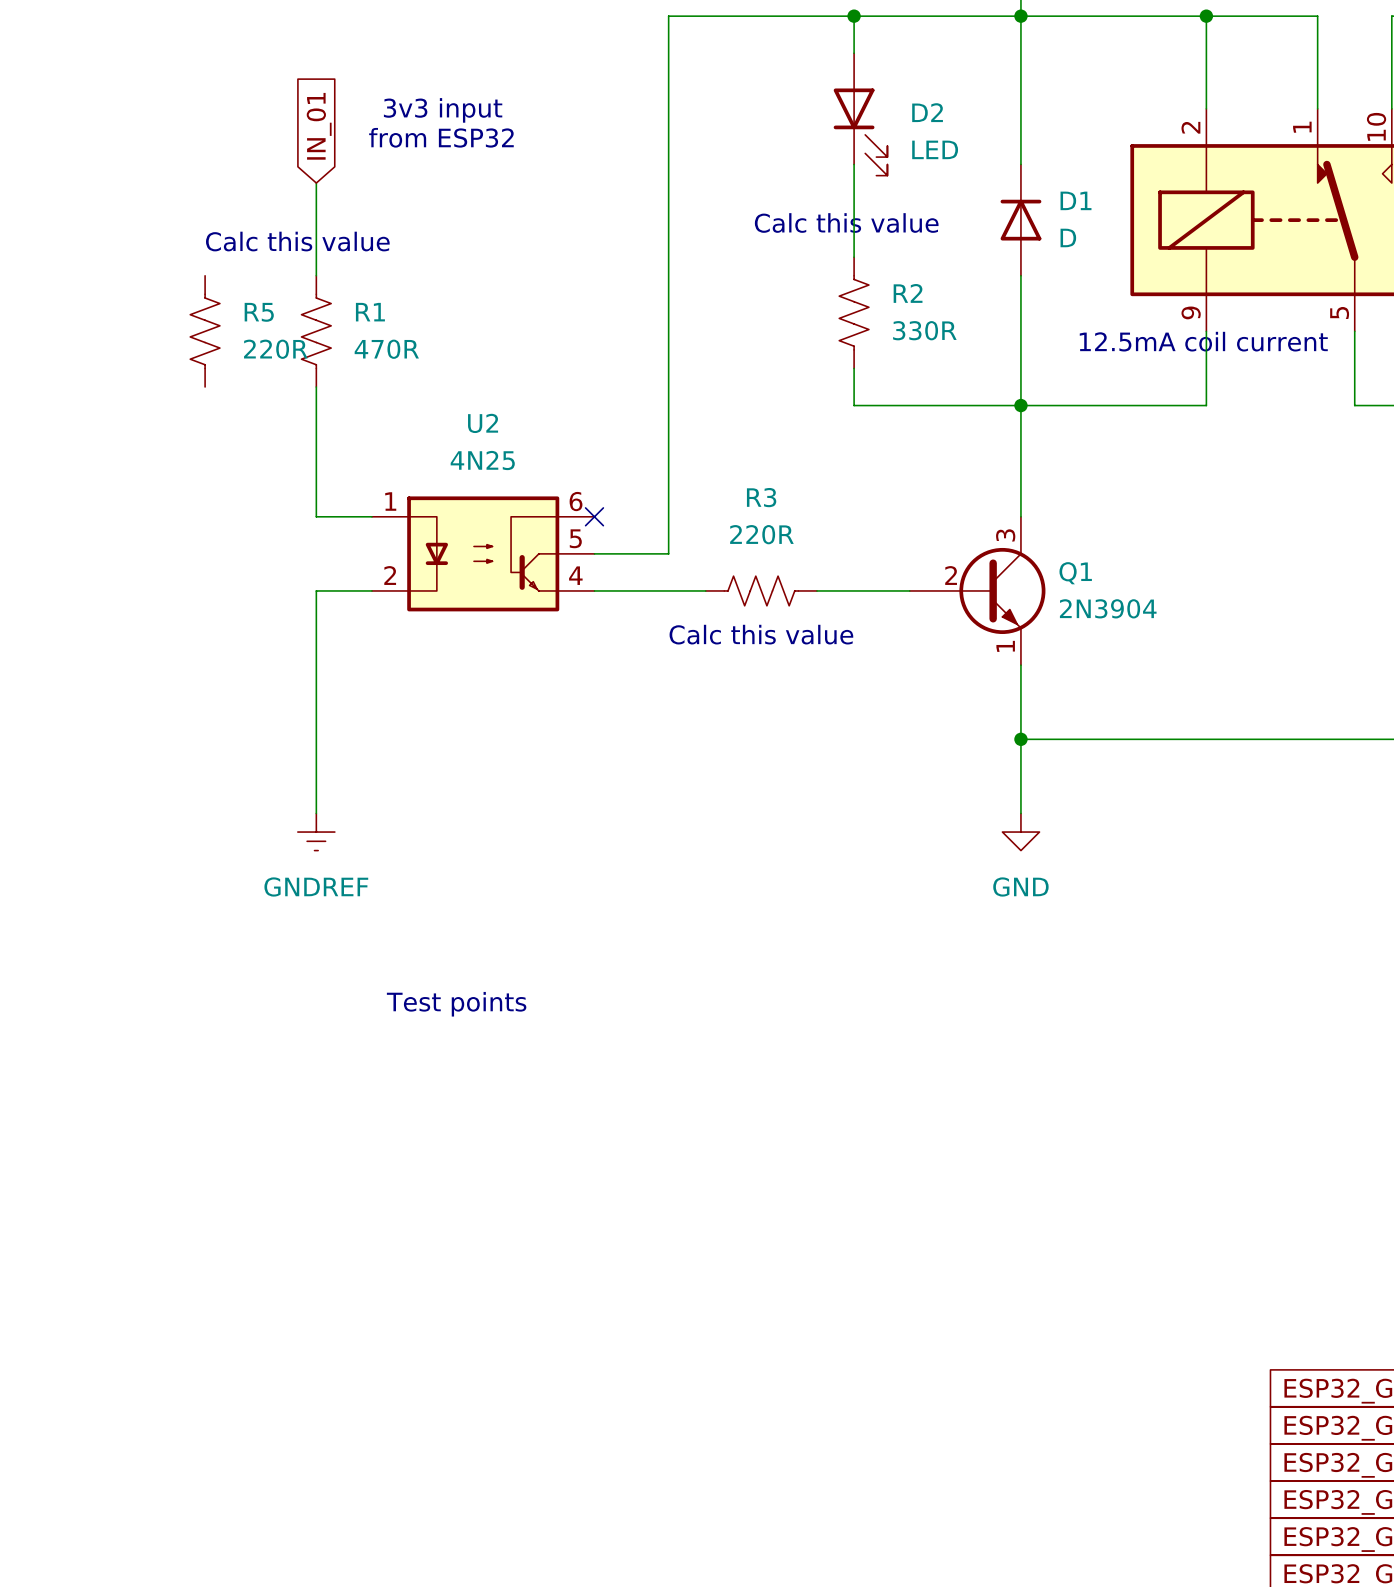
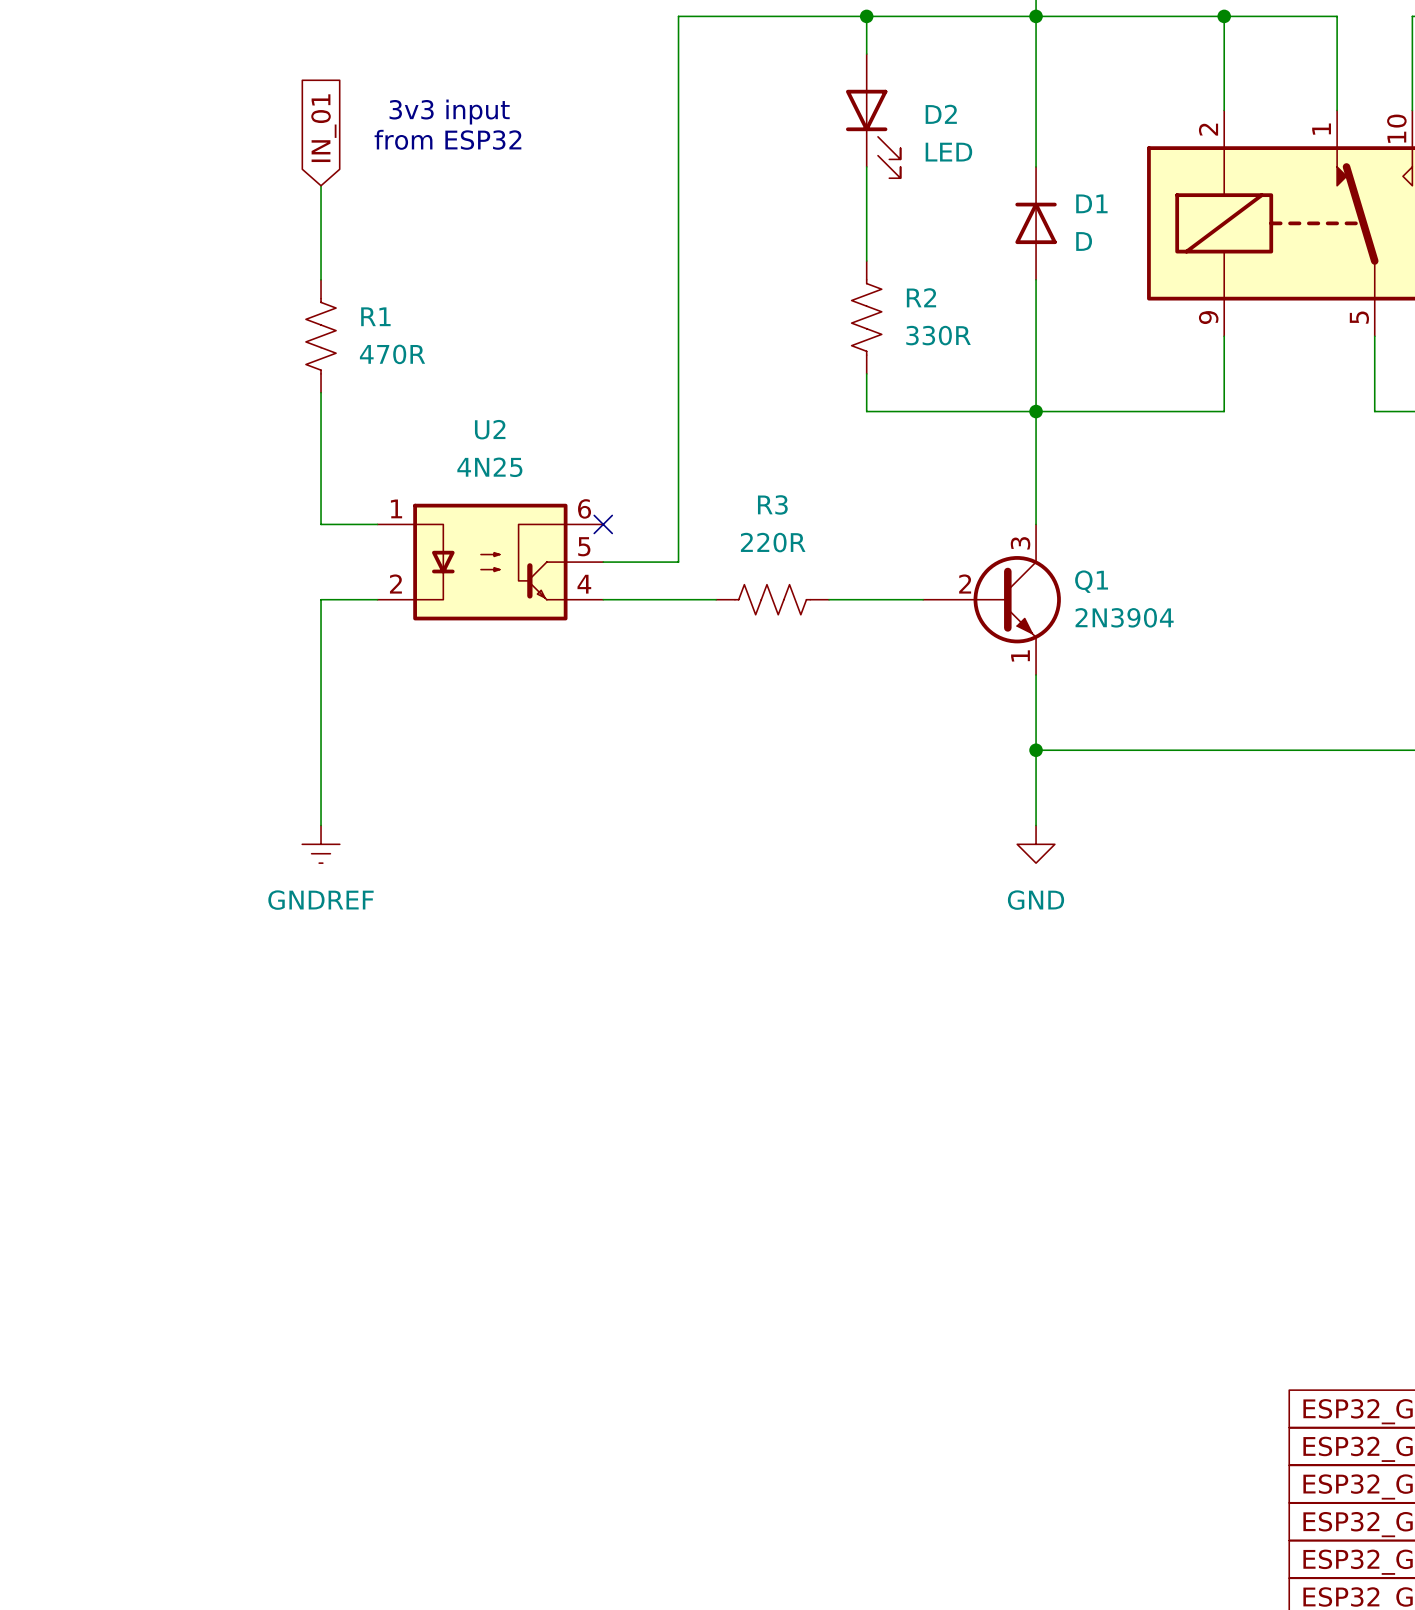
text: Calc this value (846, 222) -> none
text: Calc this value (297, 241) -> none
R5: 220R (205, 331) -> none
text: 12.5mA coil current (1203, 341) -> none
text: Calc this value (761, 634) -> none
text: Test points (456, 1004) -> none

